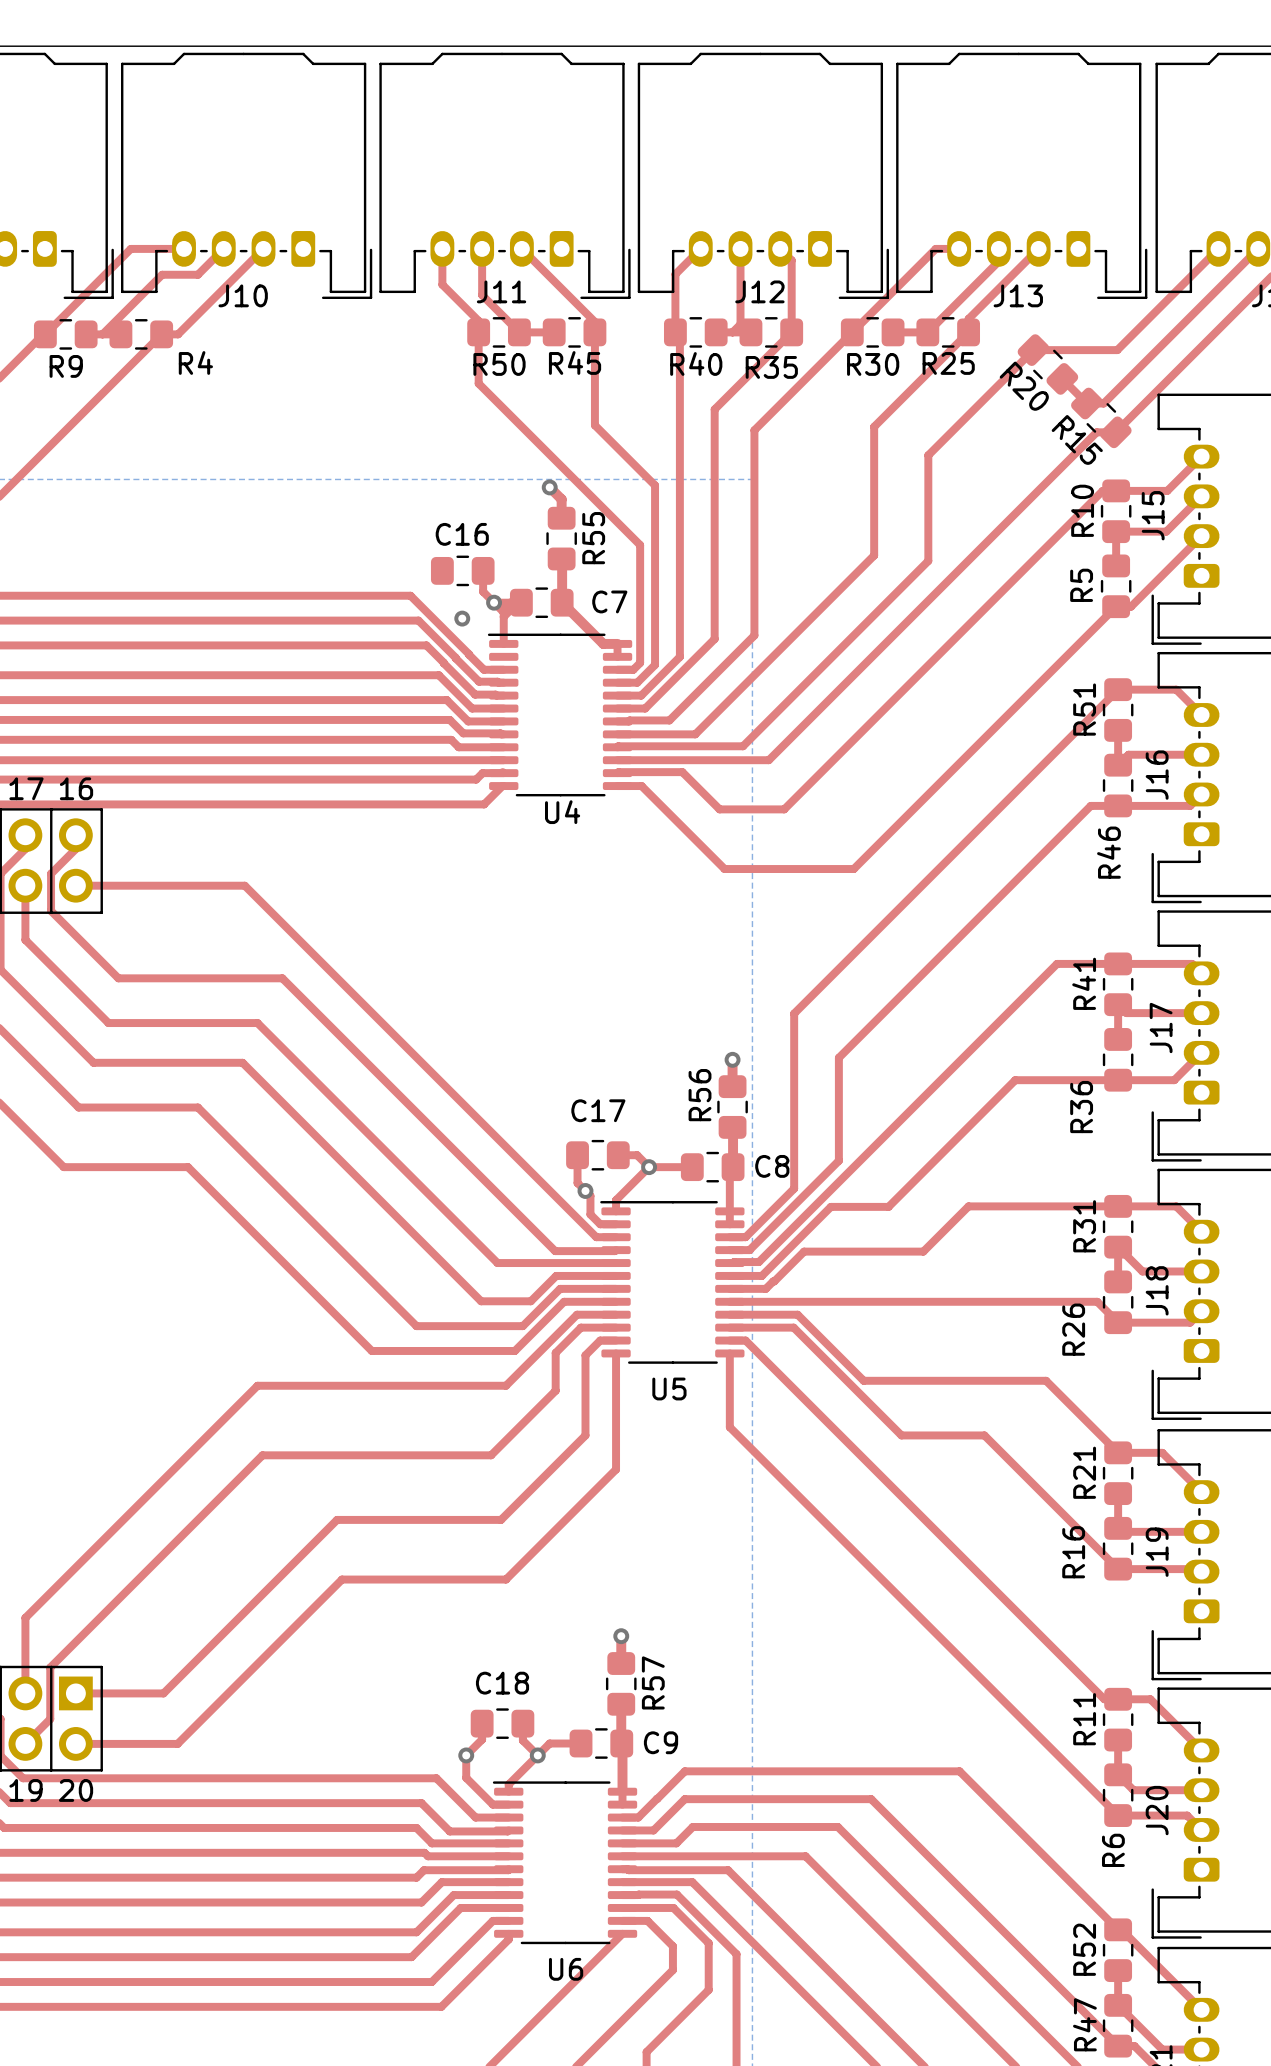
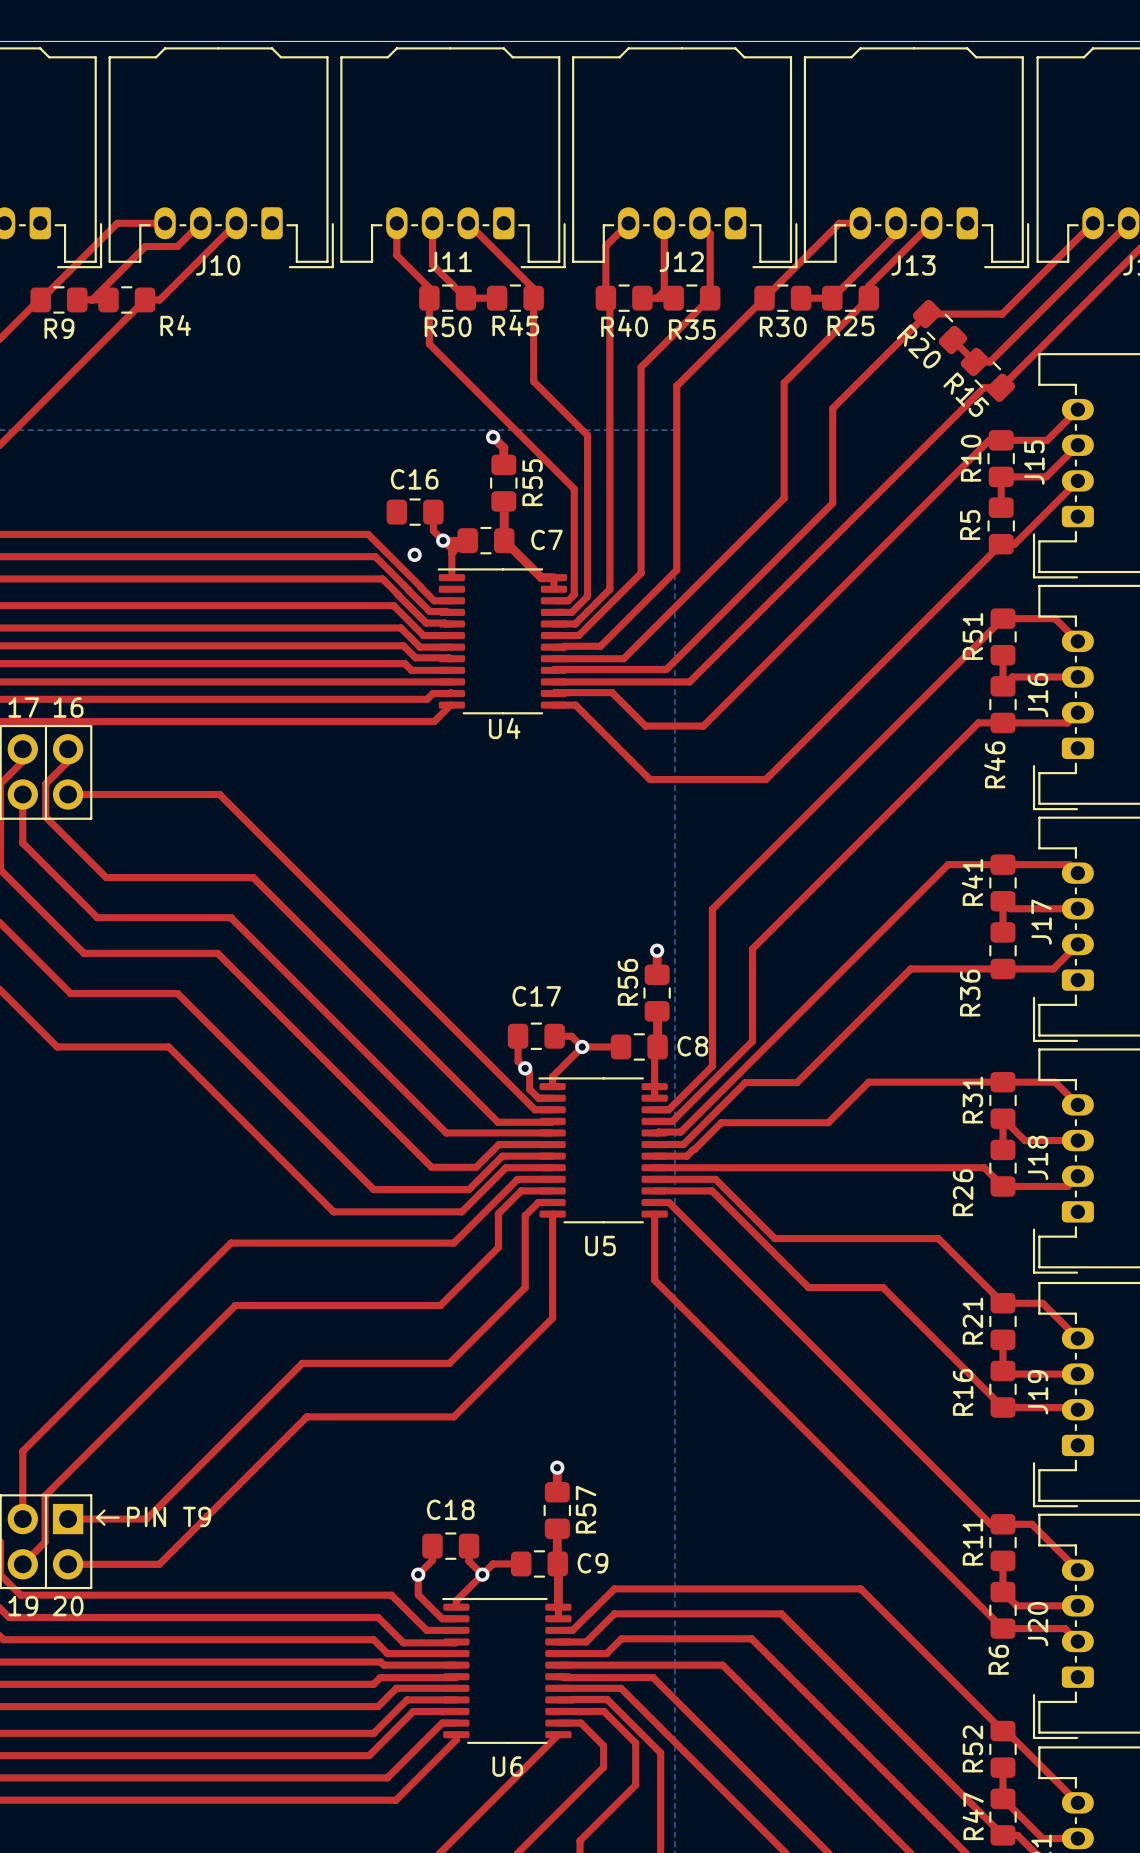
line: none -> (104, 1510) (97, 1517)
line: none -> (97, 1517) (104, 1524)
line: none -> (97, 1517) (118, 1517)
text: none -> PIN T9 (169, 1516)

